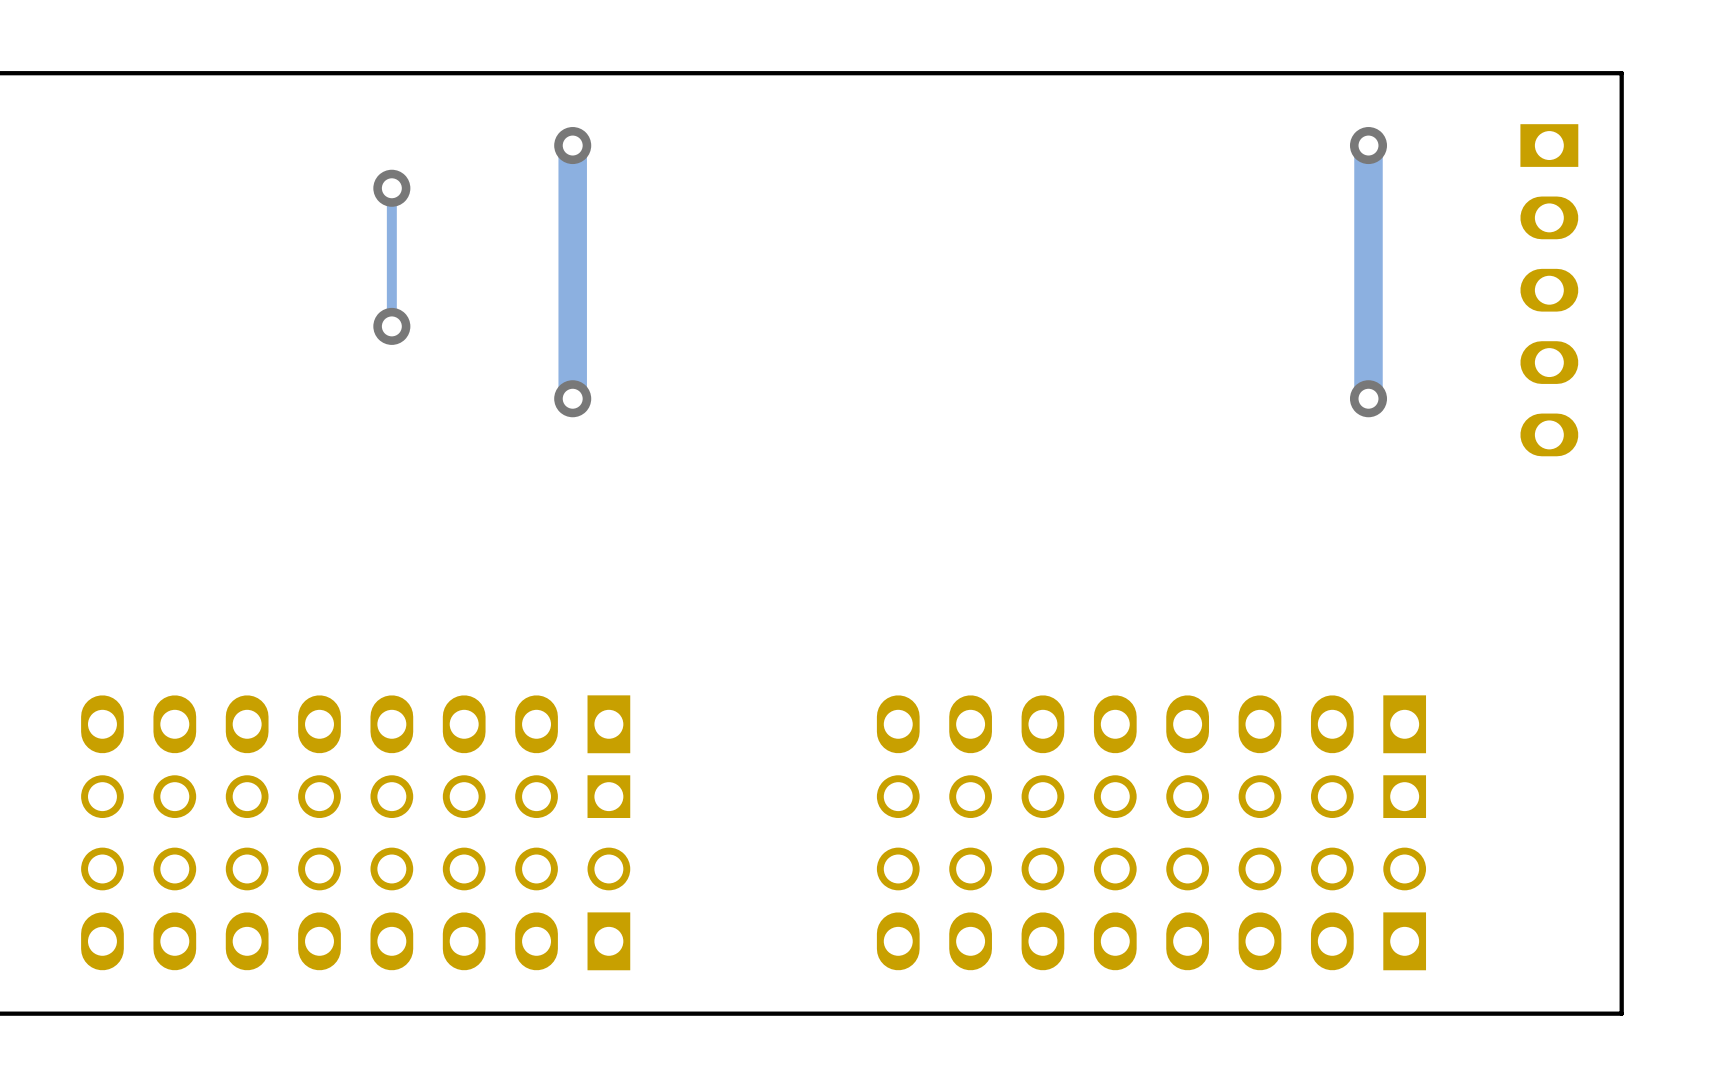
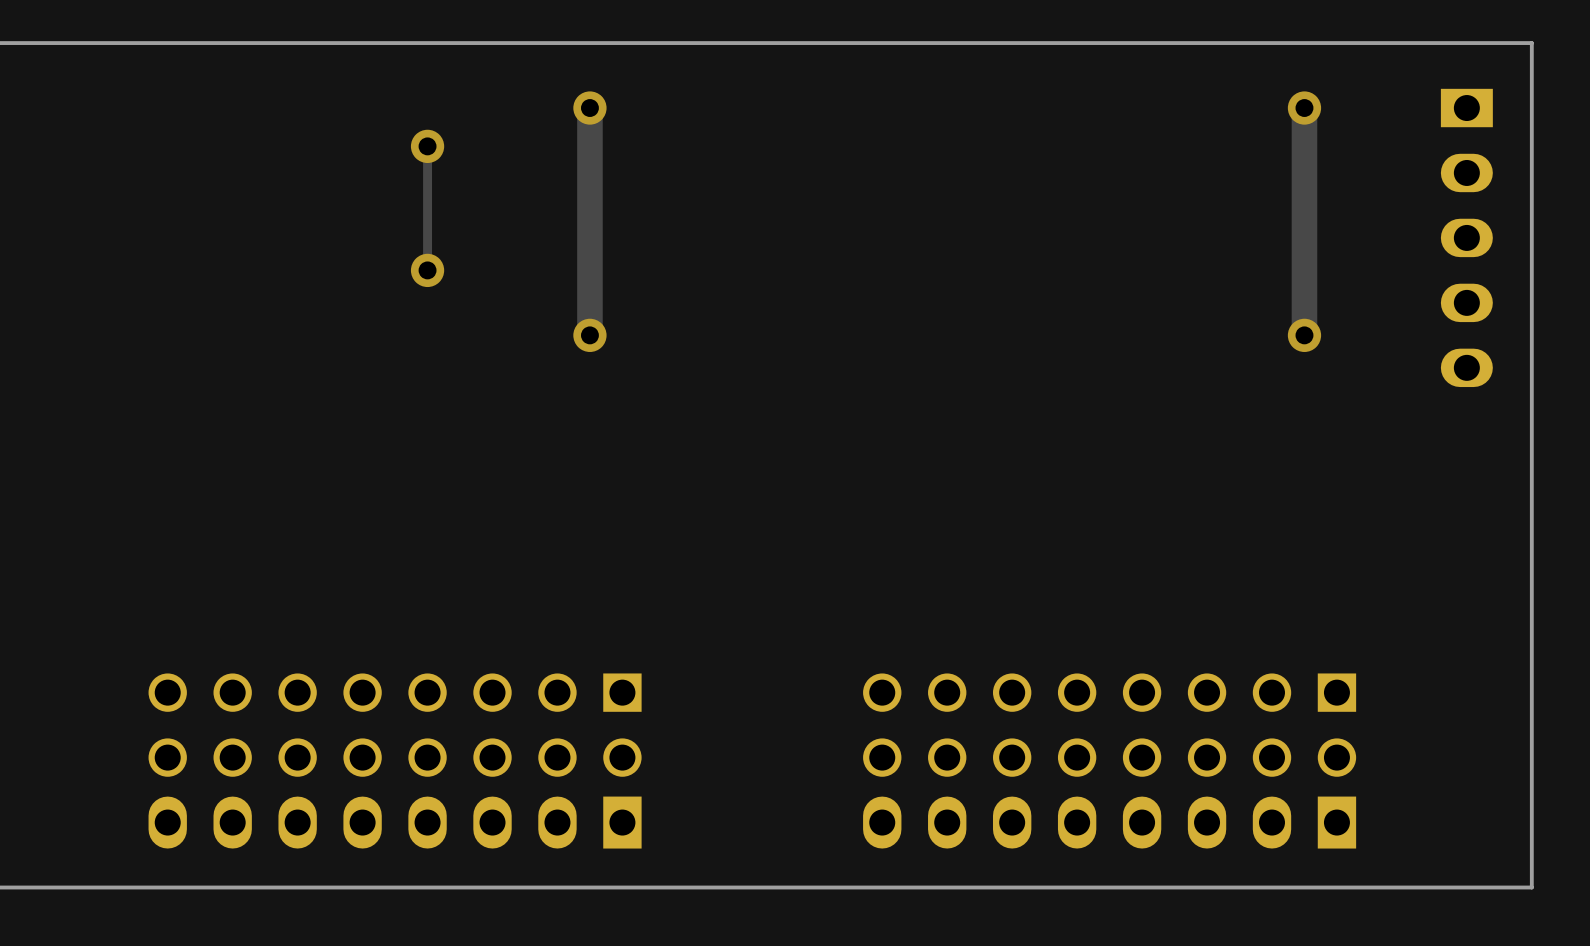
part: (355, 724) -> none
part: (1151, 724) -> none

